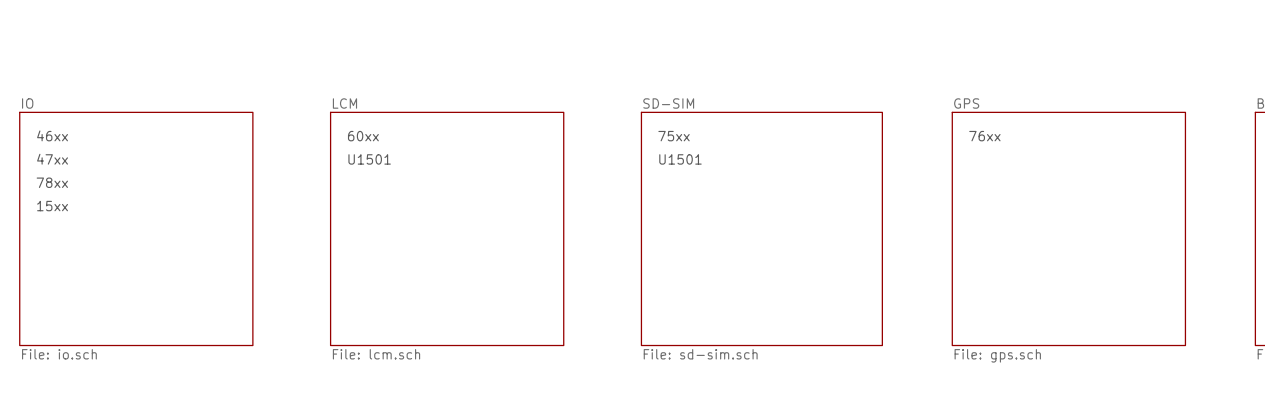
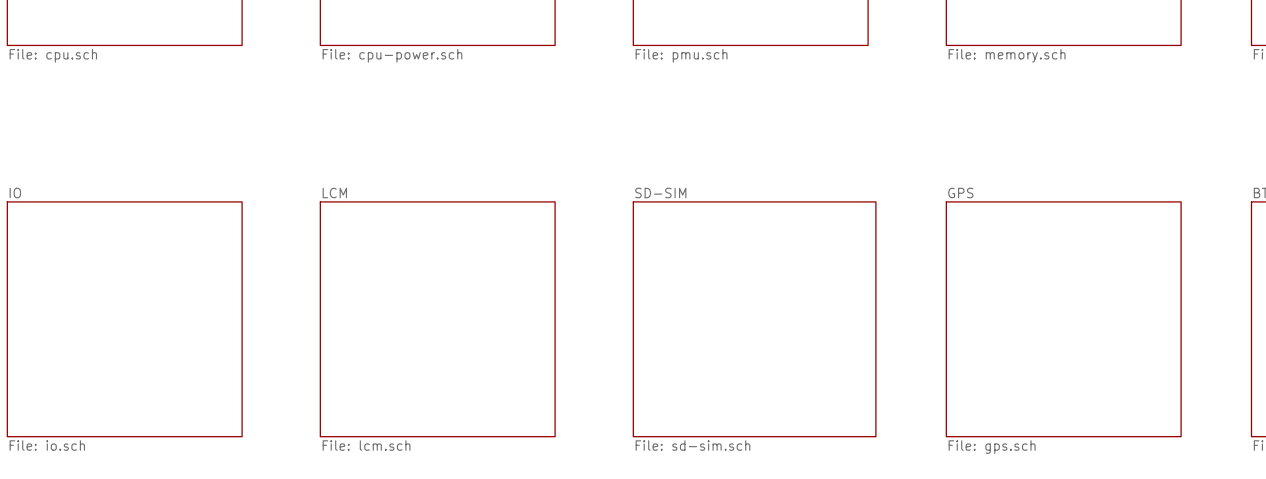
text: 46xx (52, 135) -> none
text: 60xx (363, 136) -> none
text: 75xx (674, 136) -> none
text: 76xx (984, 136) -> none
text: 47xx (52, 159) -> none
text: U1501 (369, 159) -> none
text: U1501 (680, 159) -> none
text: 78xx (52, 182) -> none
text: 15xx (52, 206) -> none

